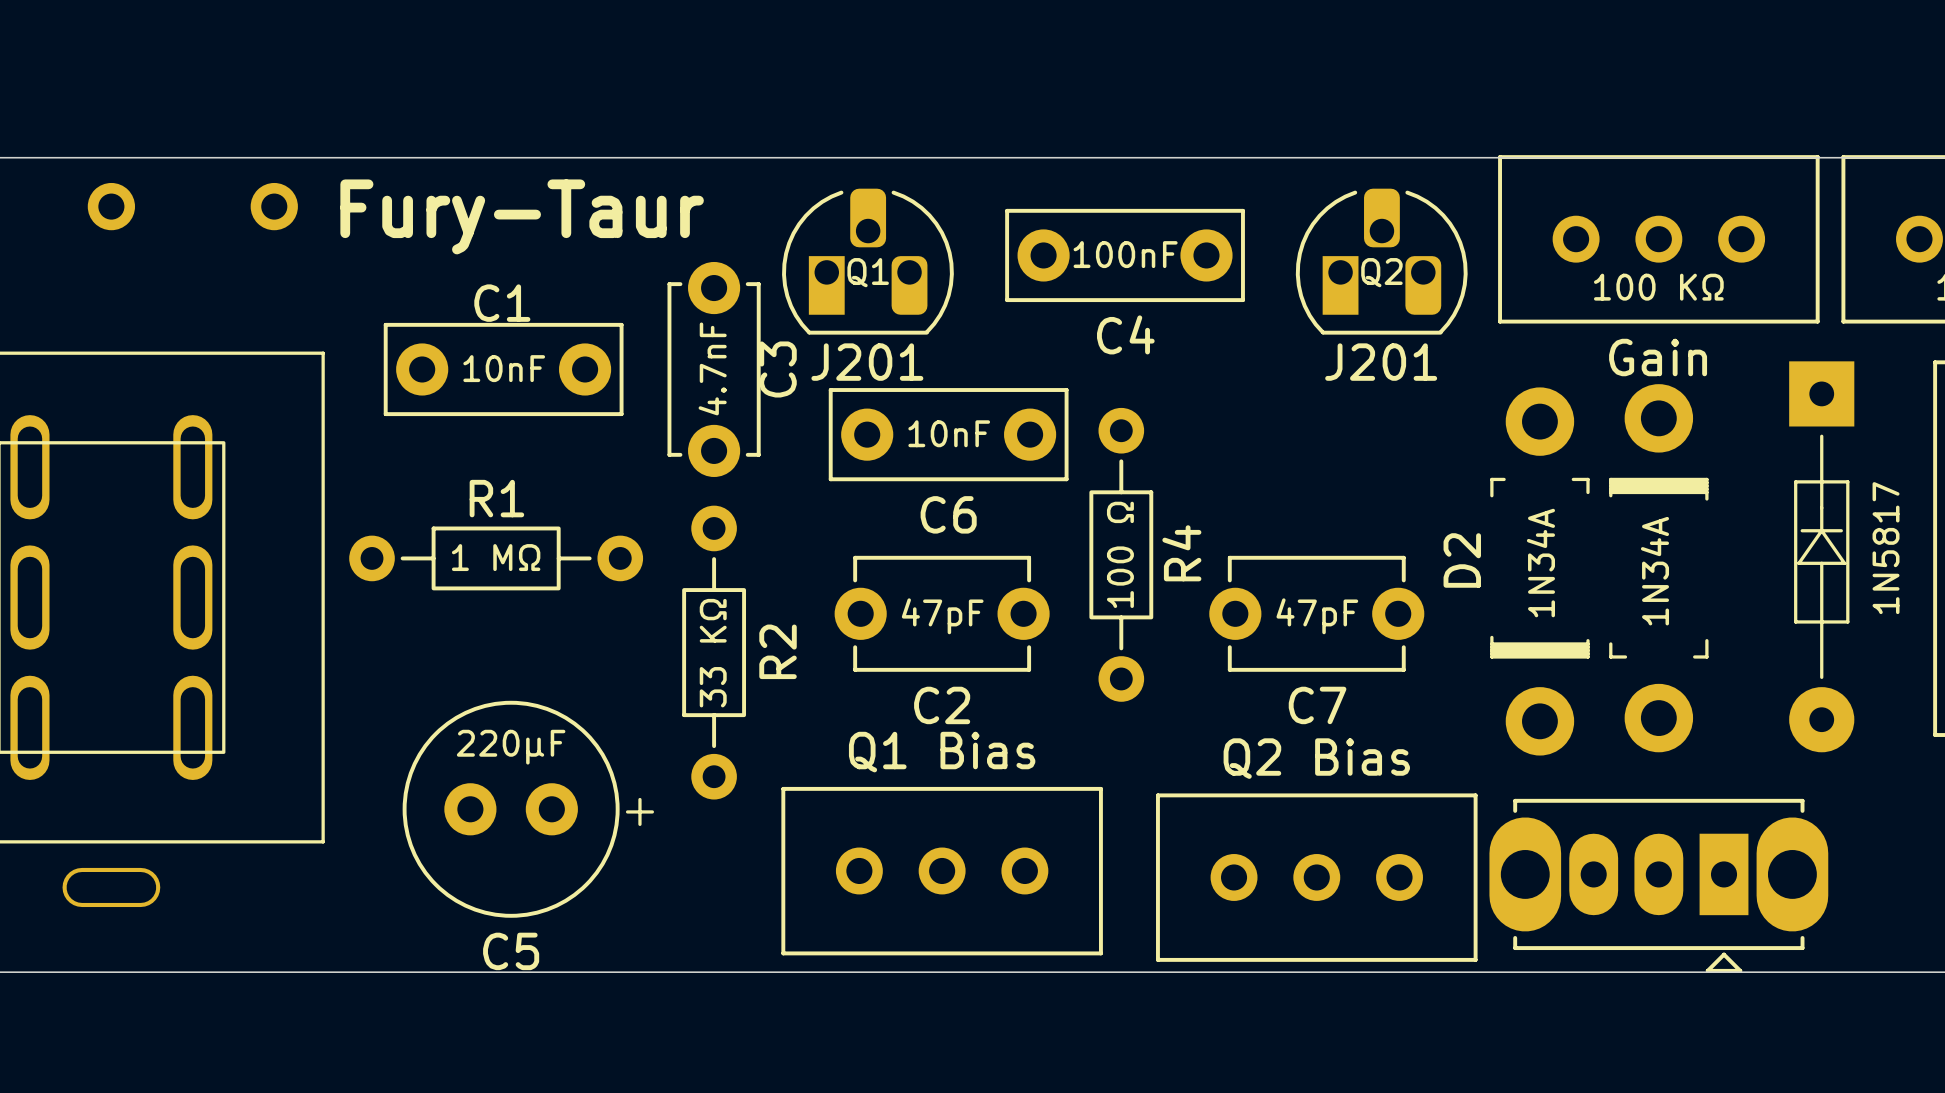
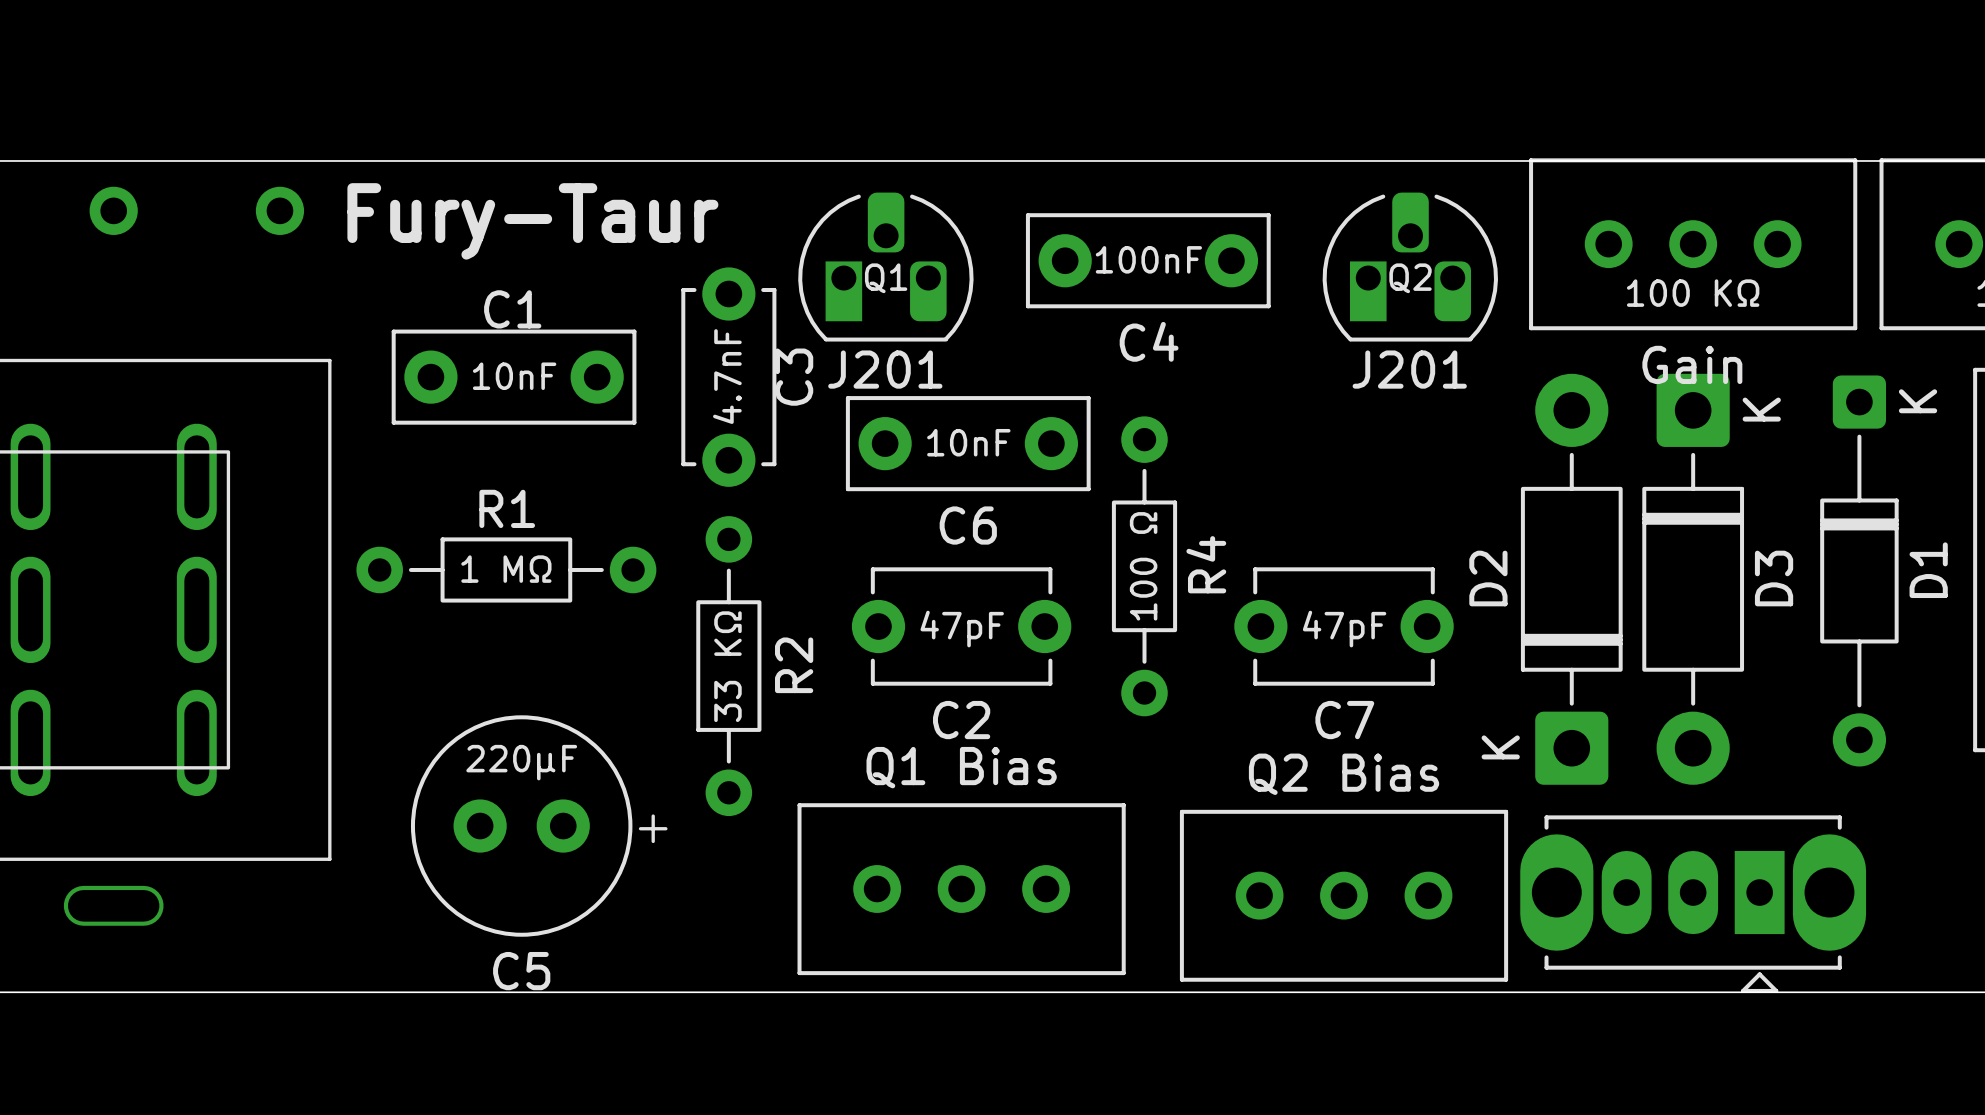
D2 footprint: [1490, 387, 1590, 756] -> [1520, 373, 1623, 785]
part: 1N5817 (1821, 556) -> none
D1: none -> (1859, 570)
D3: none -> (1693, 579)
part: (1658, 568) -> none

